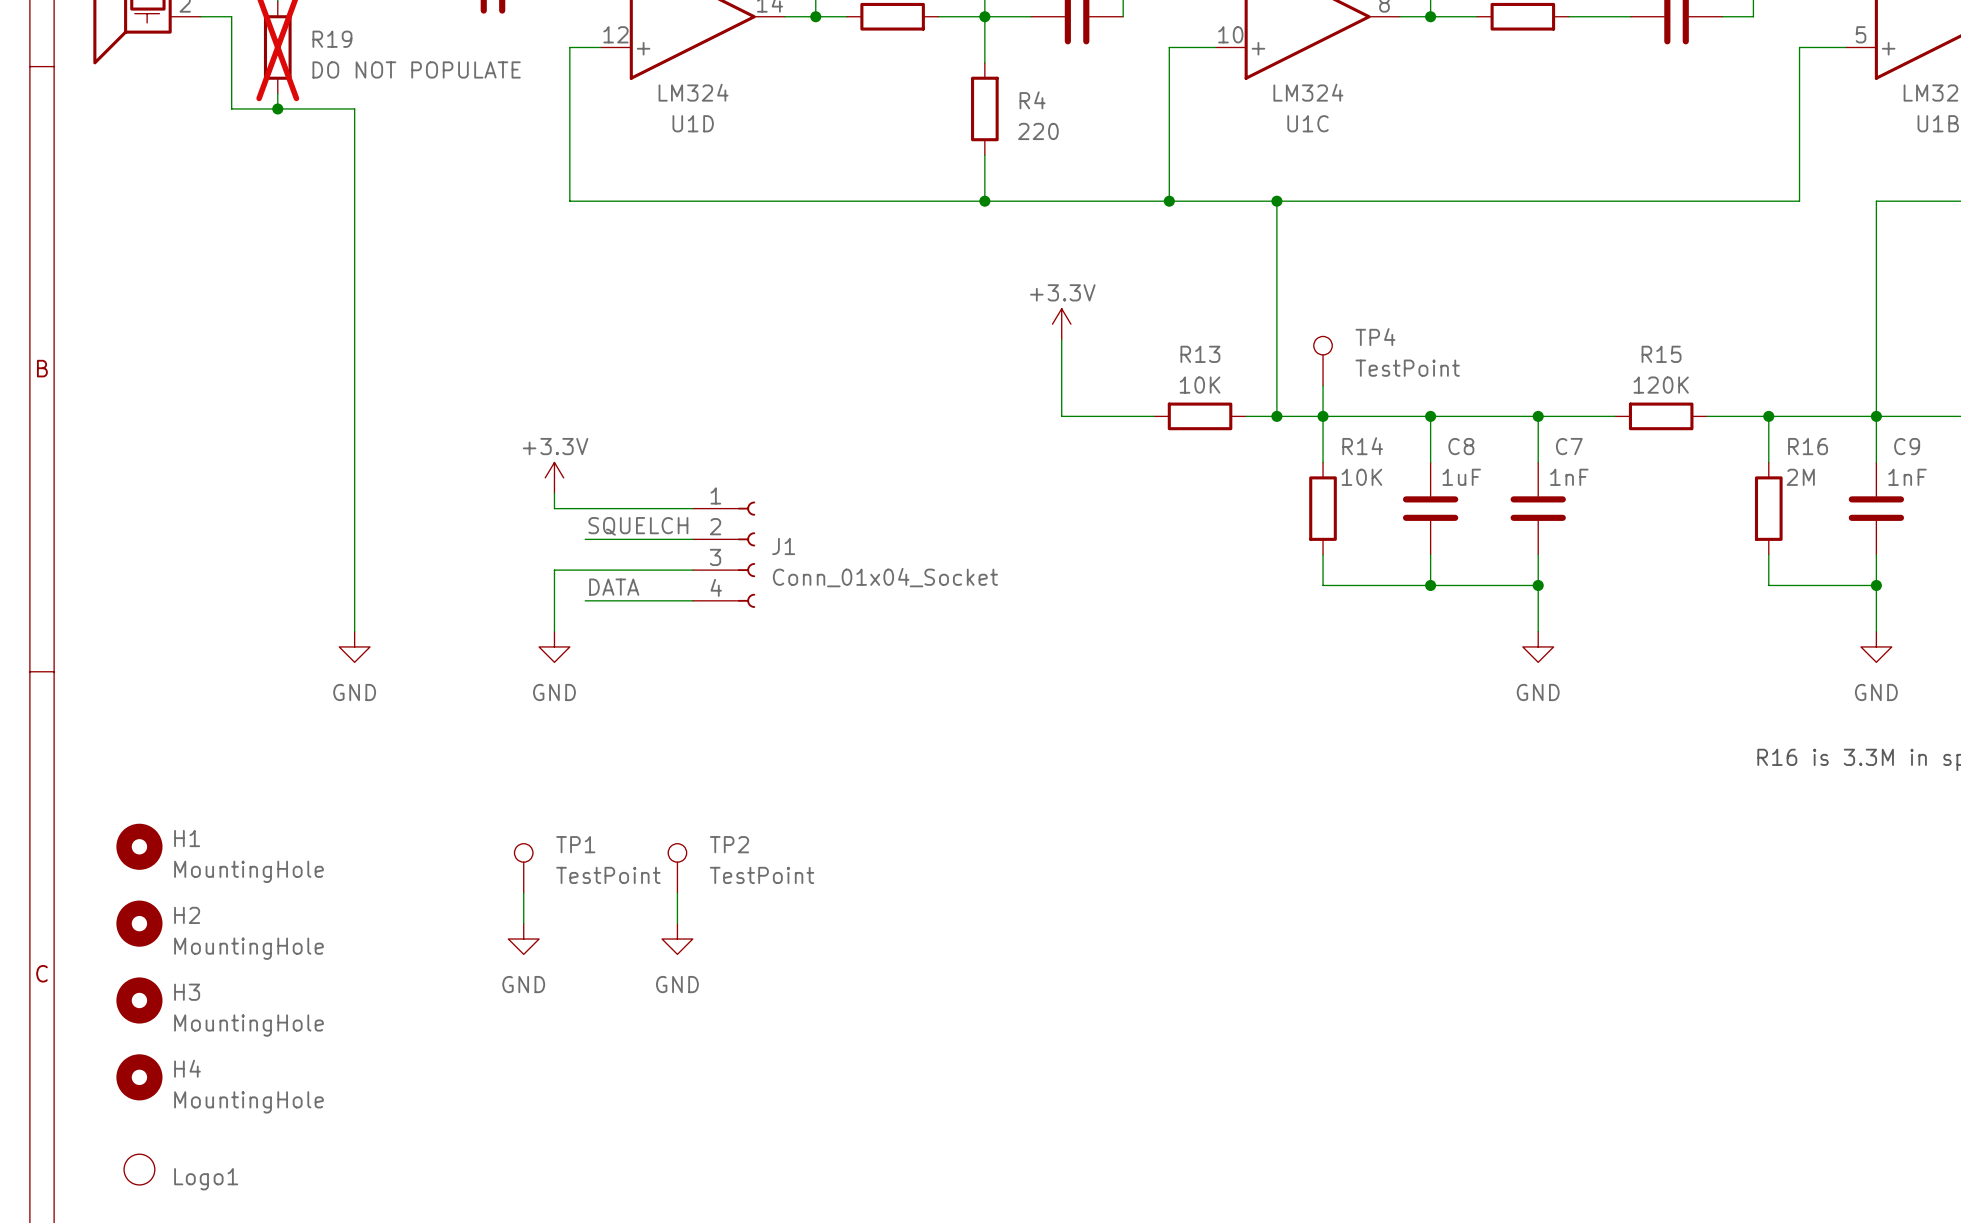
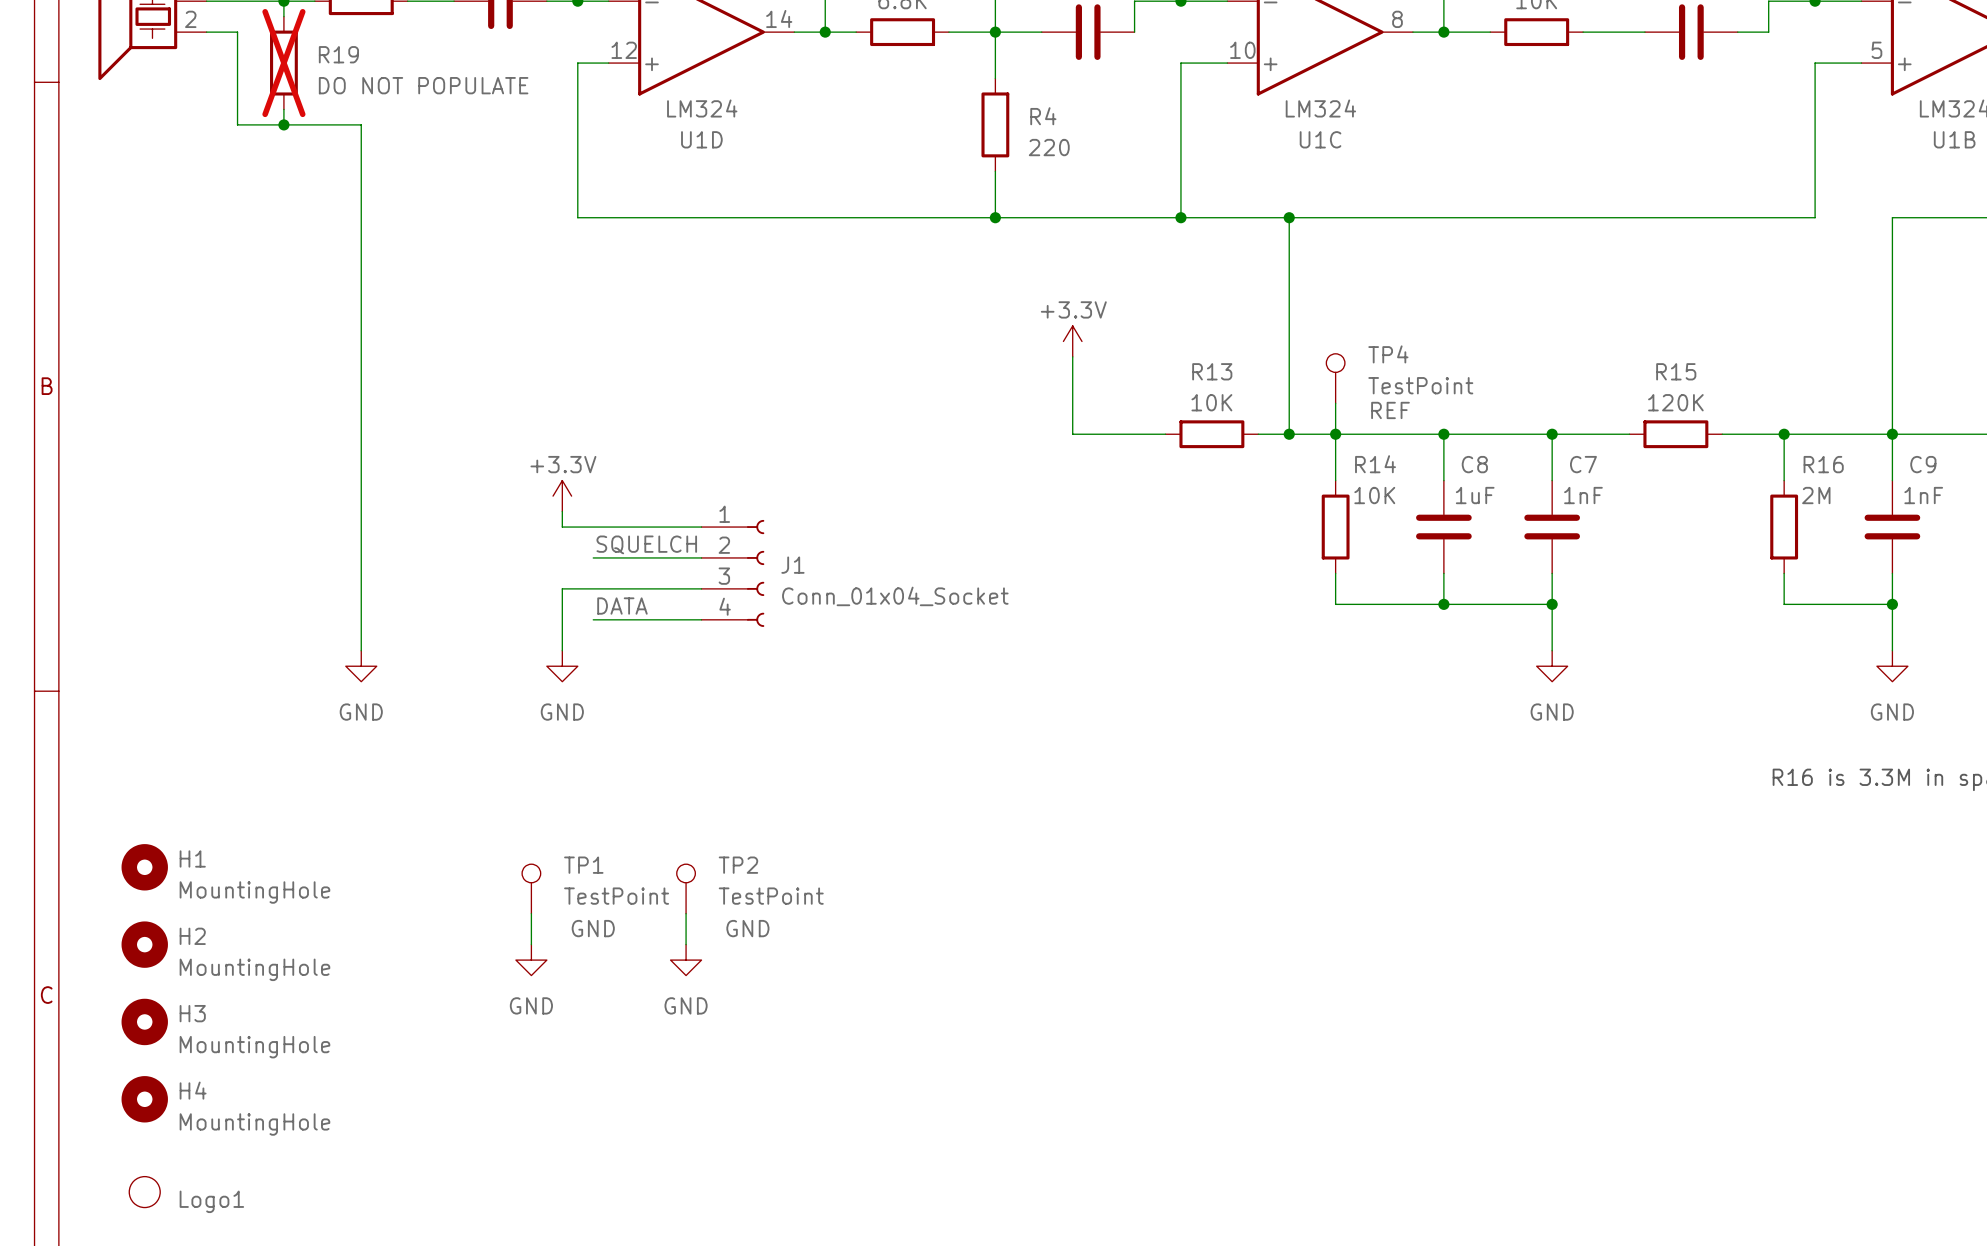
TP4 text: none -> REF (1390, 410)
TP1 text: none -> GND (593, 928)
TP2 text: none -> GND (747, 928)

